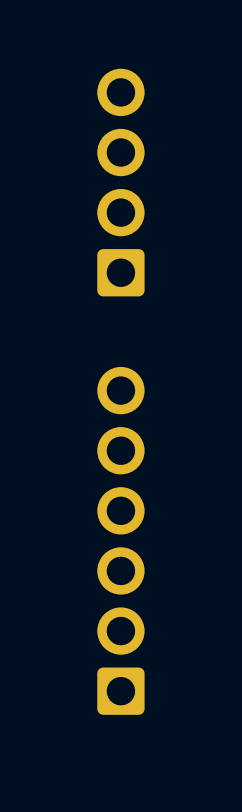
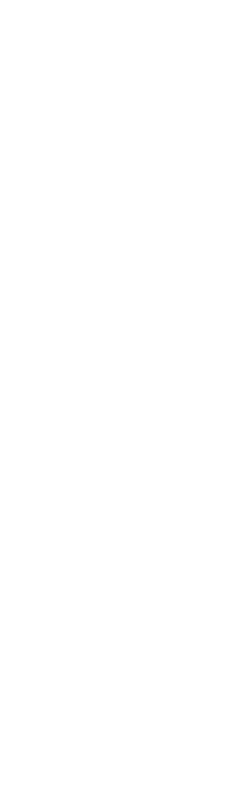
part: (120, 182) -> none
part: (120, 540) -> none

